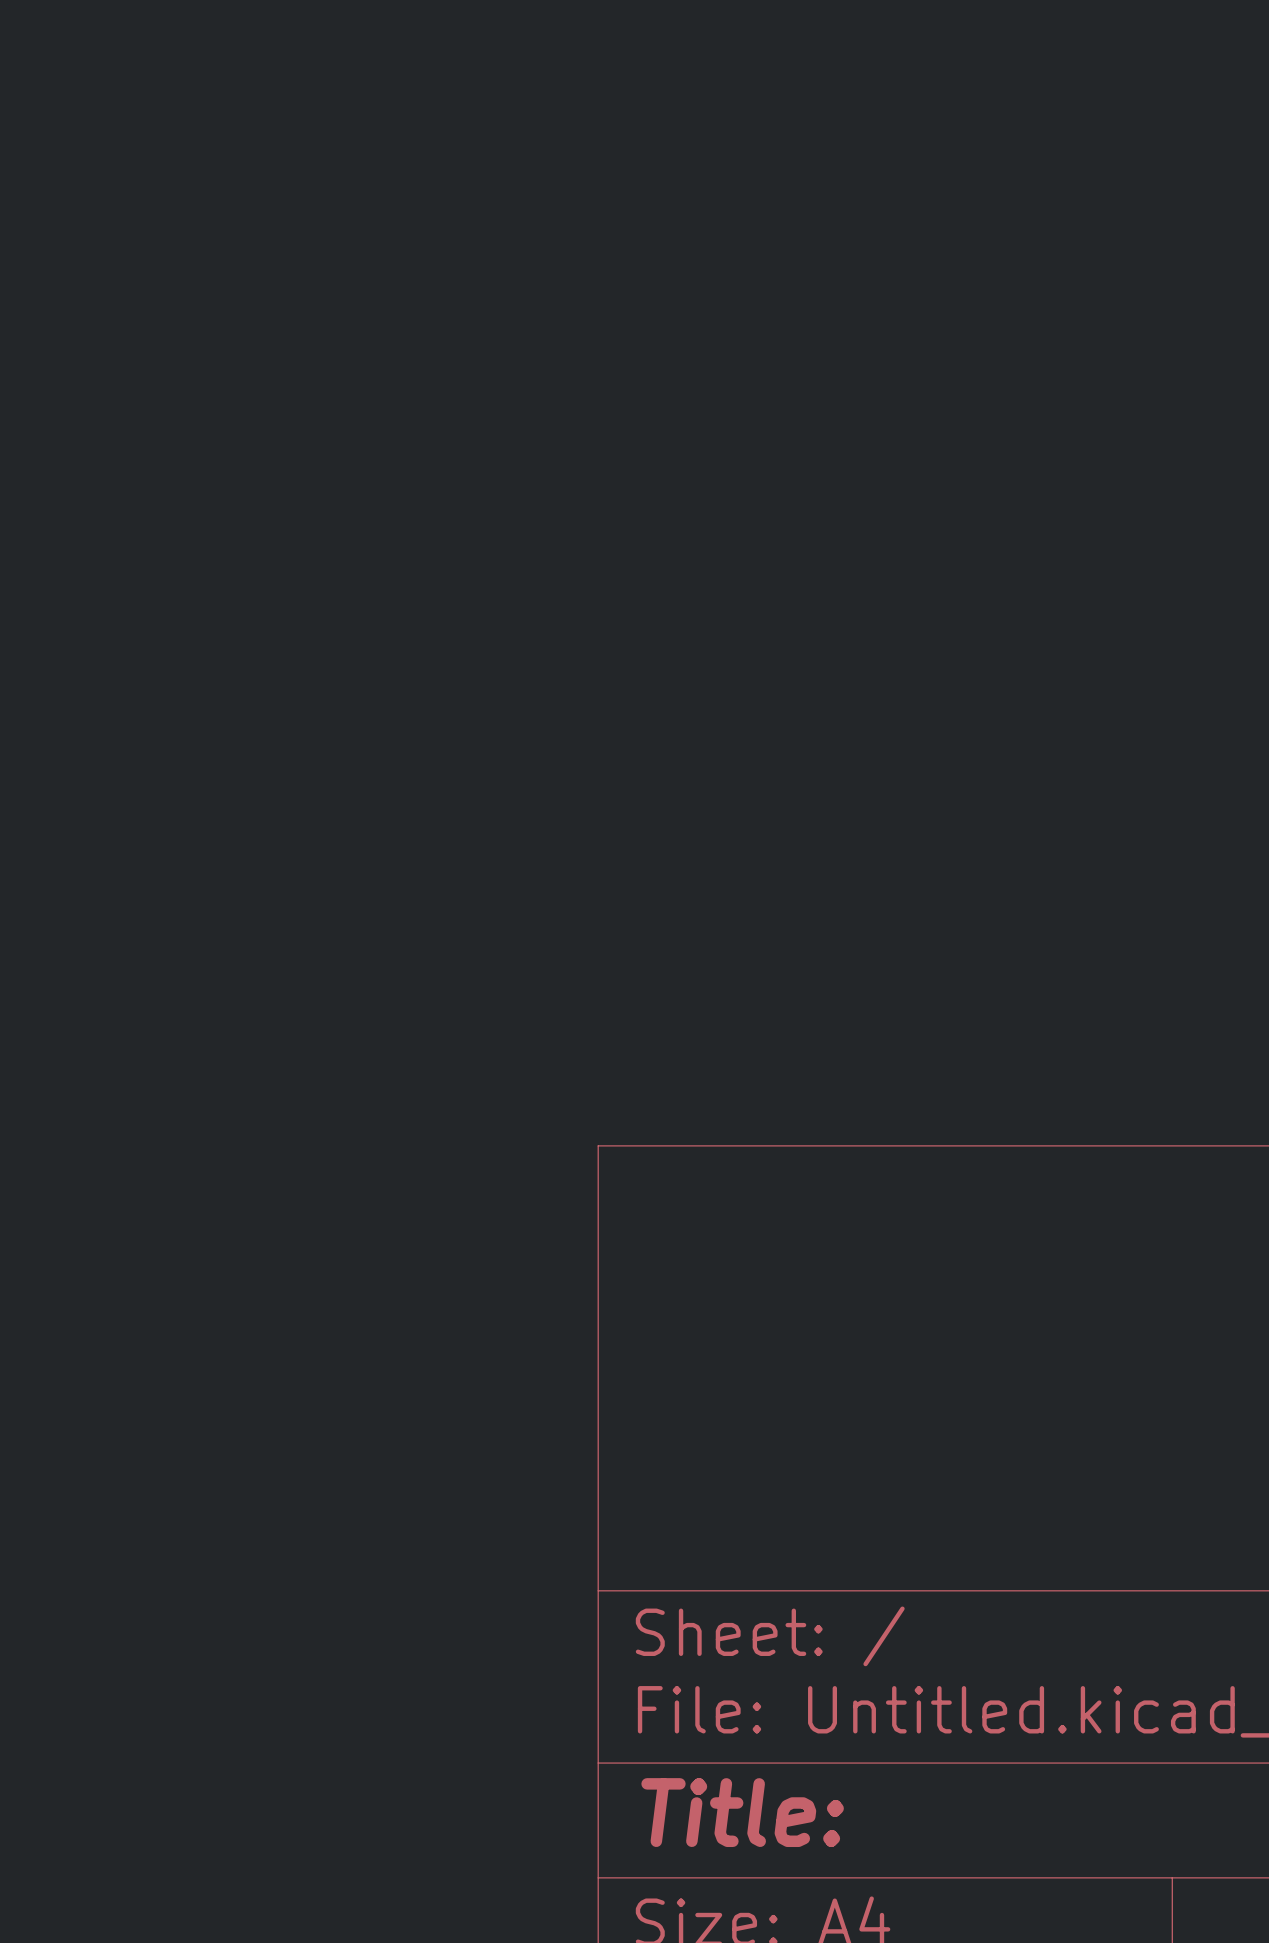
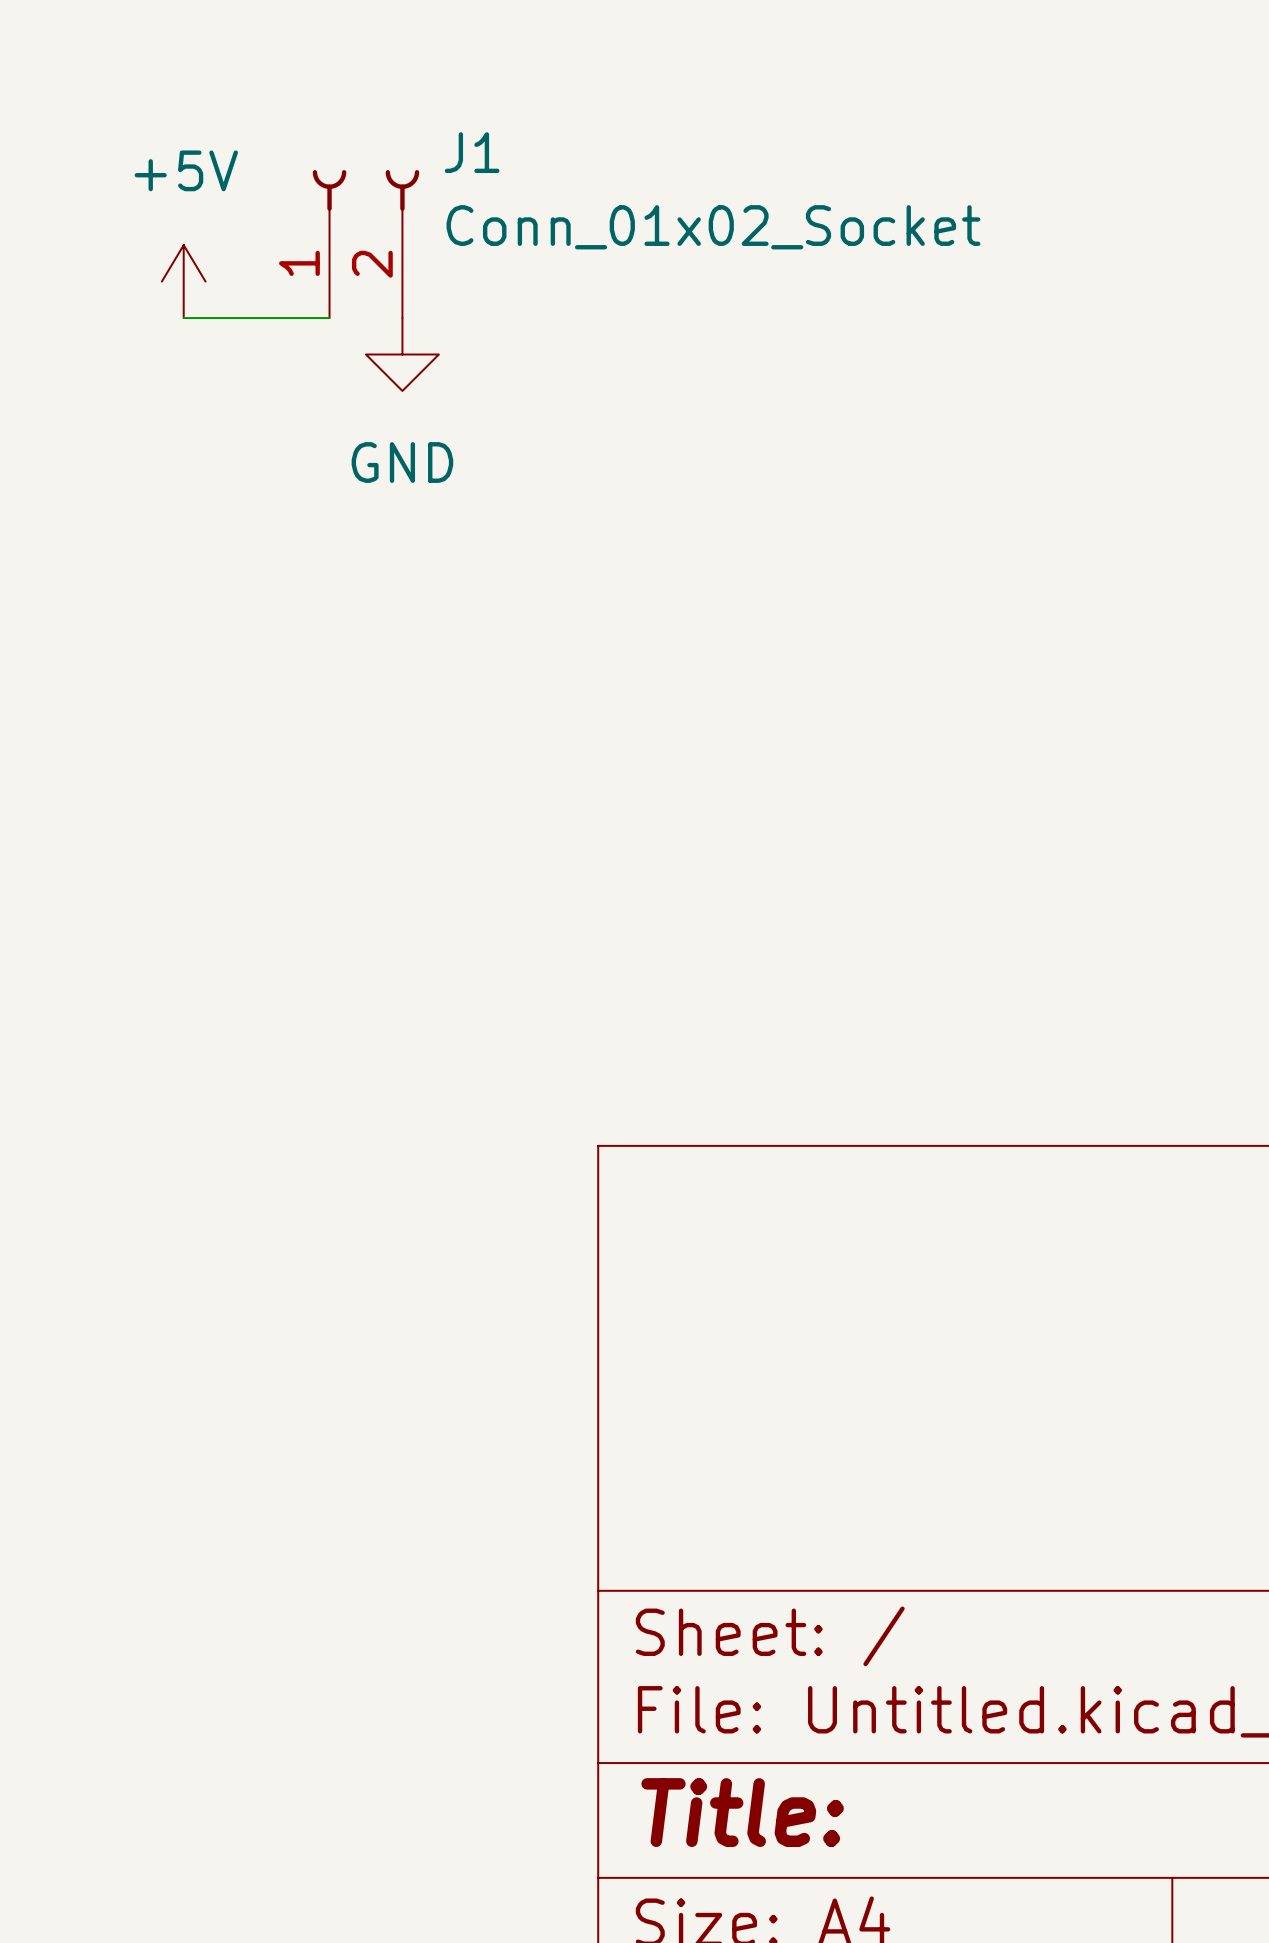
J1: none -> Conn_01x02_Socket (365, 244)
power symbol: none -> +5V (183, 281)
wire: none -> (183, 318) (329, 318)
power symbol: none -> GND (402, 354)

